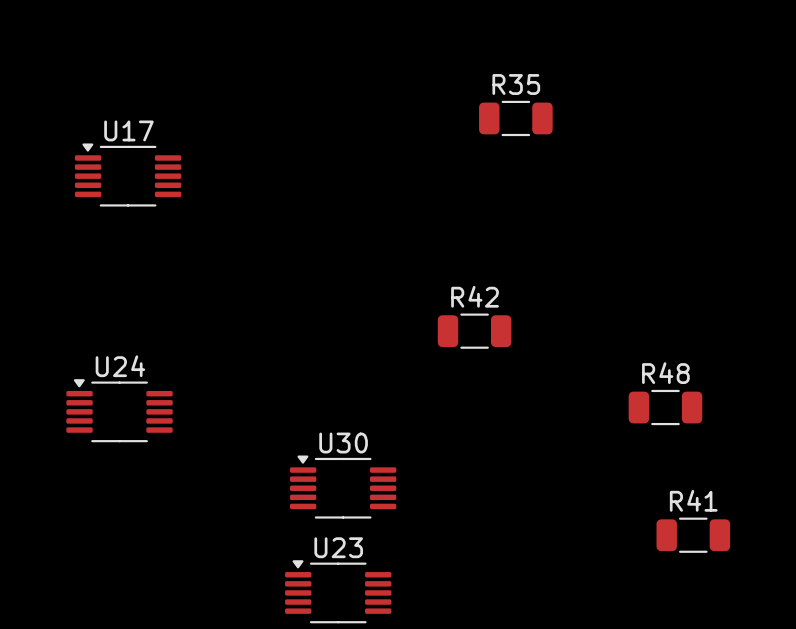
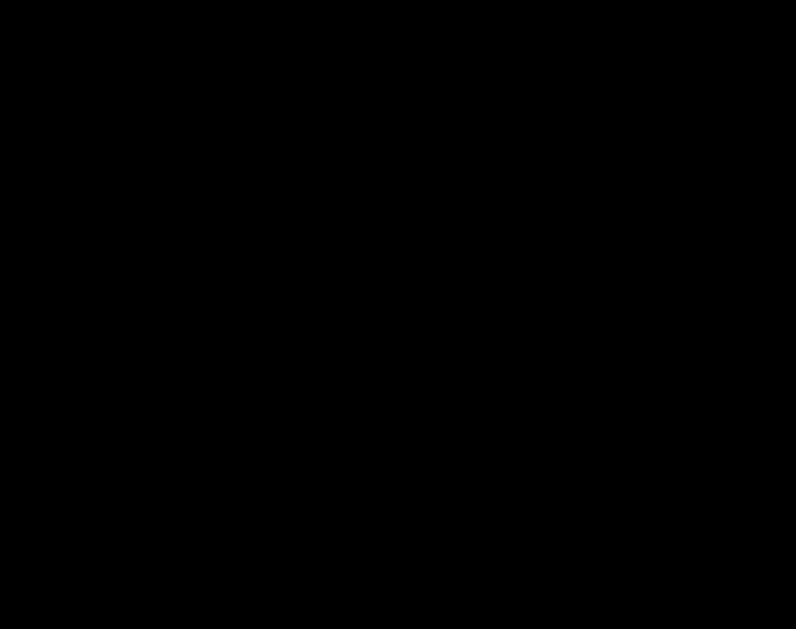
R35: (515, 118) -> none
U17: (128, 174) -> none
R42: (474, 331) -> none
R48: (665, 407) -> none
U24: (119, 410) -> none
U30: (343, 487) -> none
R41: (693, 535) -> none
U23: (338, 591) -> none

